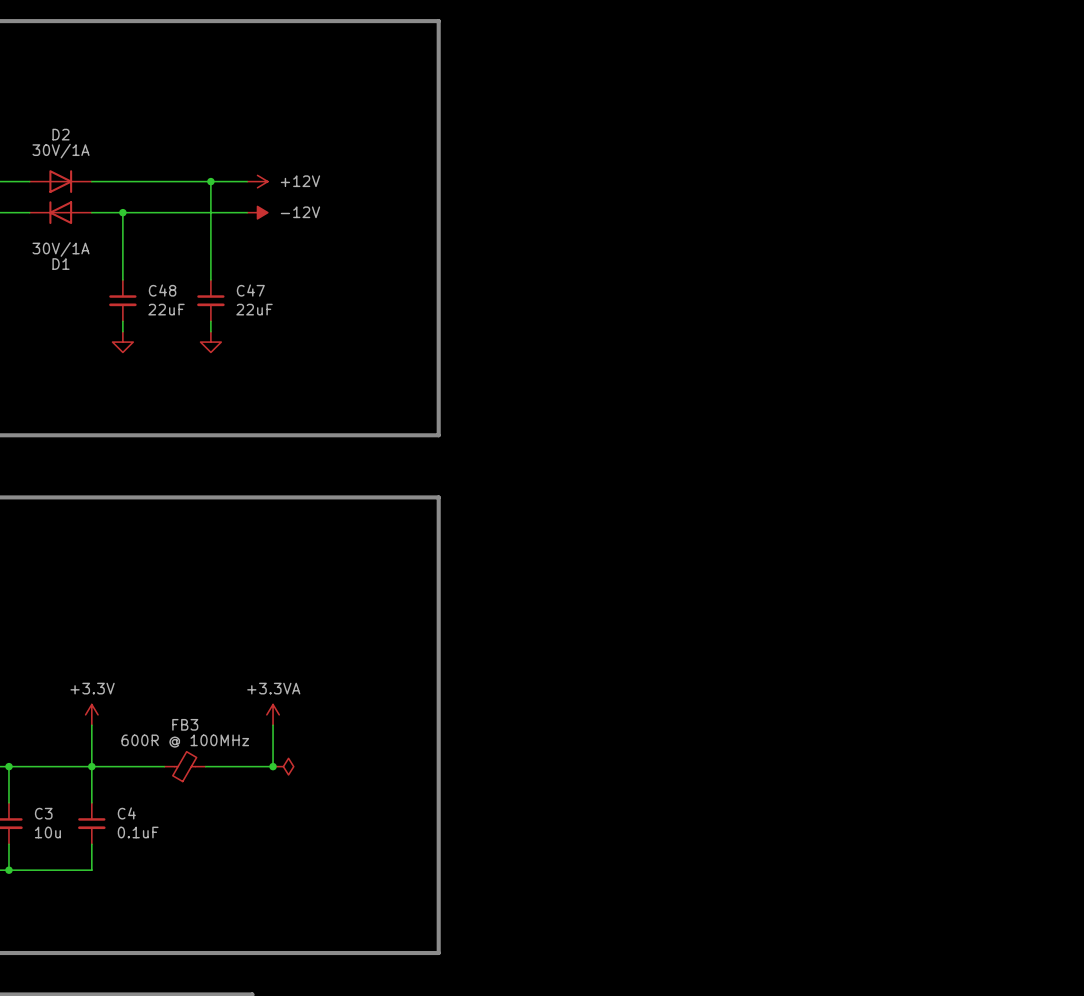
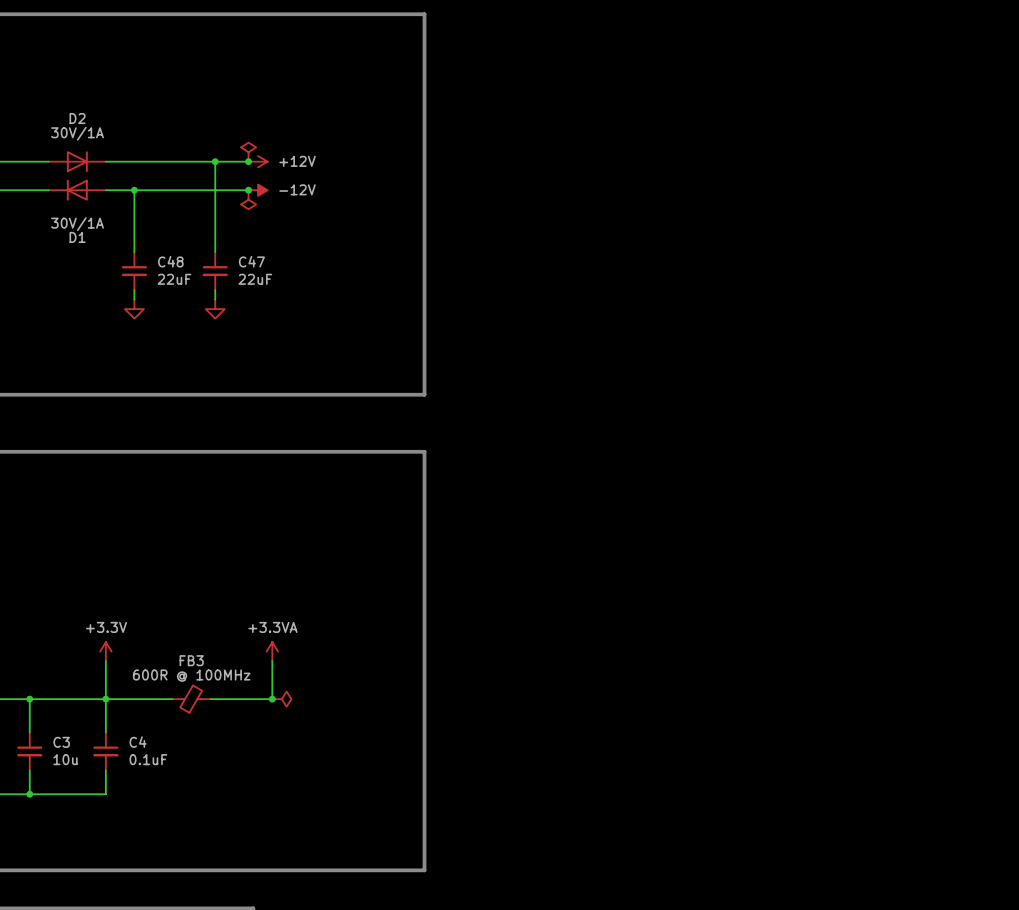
power symbol: none -> (248, 152)
junction: none -> (248, 161)
junction: none -> (248, 190)
power symbol: none -> (248, 199)

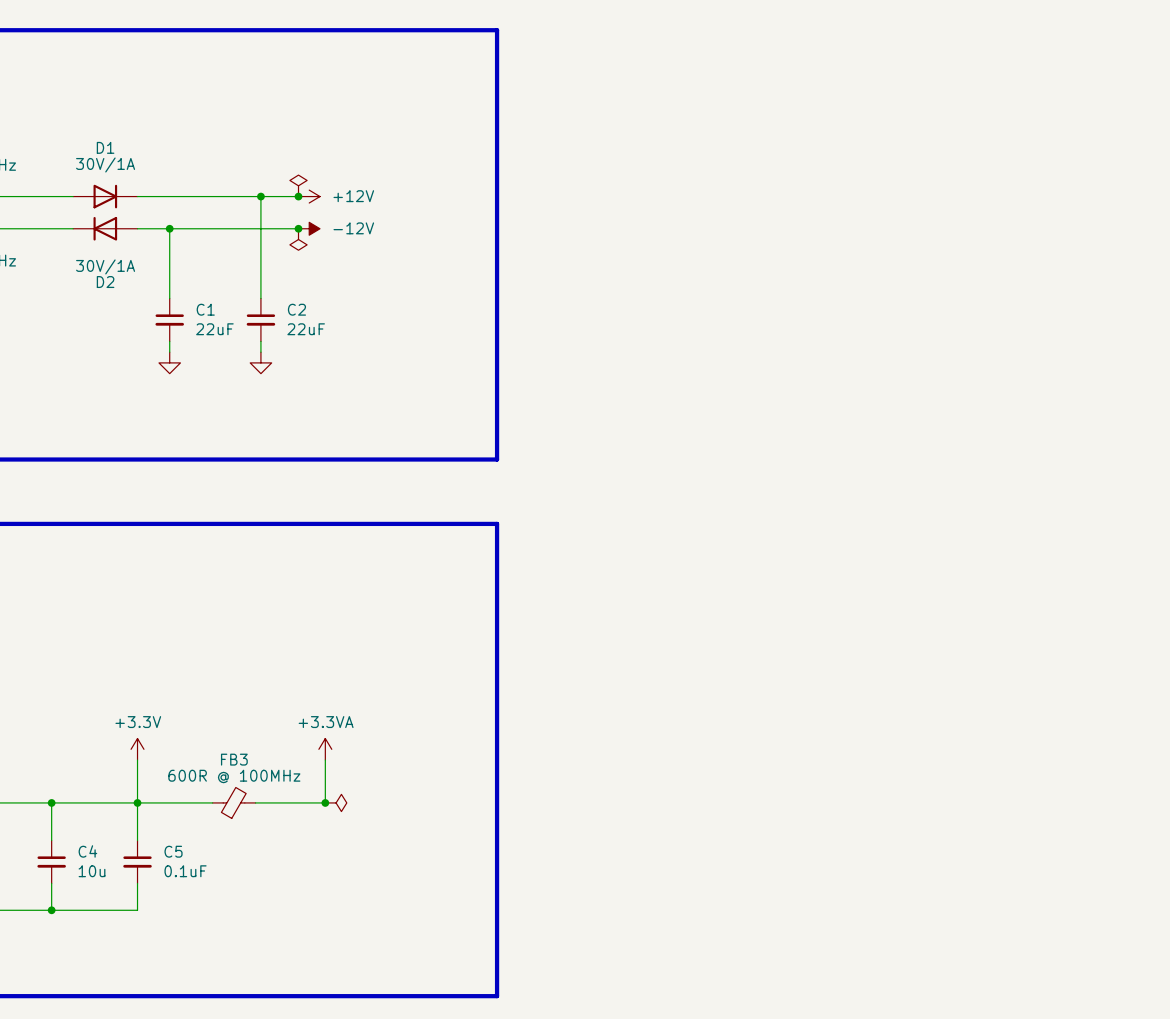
D2 name: D2 (77, 118) -> D1 (105, 147)
D1 name: D1 (77, 237) -> D2 (105, 282)
C48 name: C48 (170, 261) -> C1 (205, 309)
C47 name: C47 (251, 261) -> C2 (296, 309)
C3 name: C3 (61, 742) -> C4 (87, 851)
C4 name: C4 (138, 742) -> C5 (173, 851)

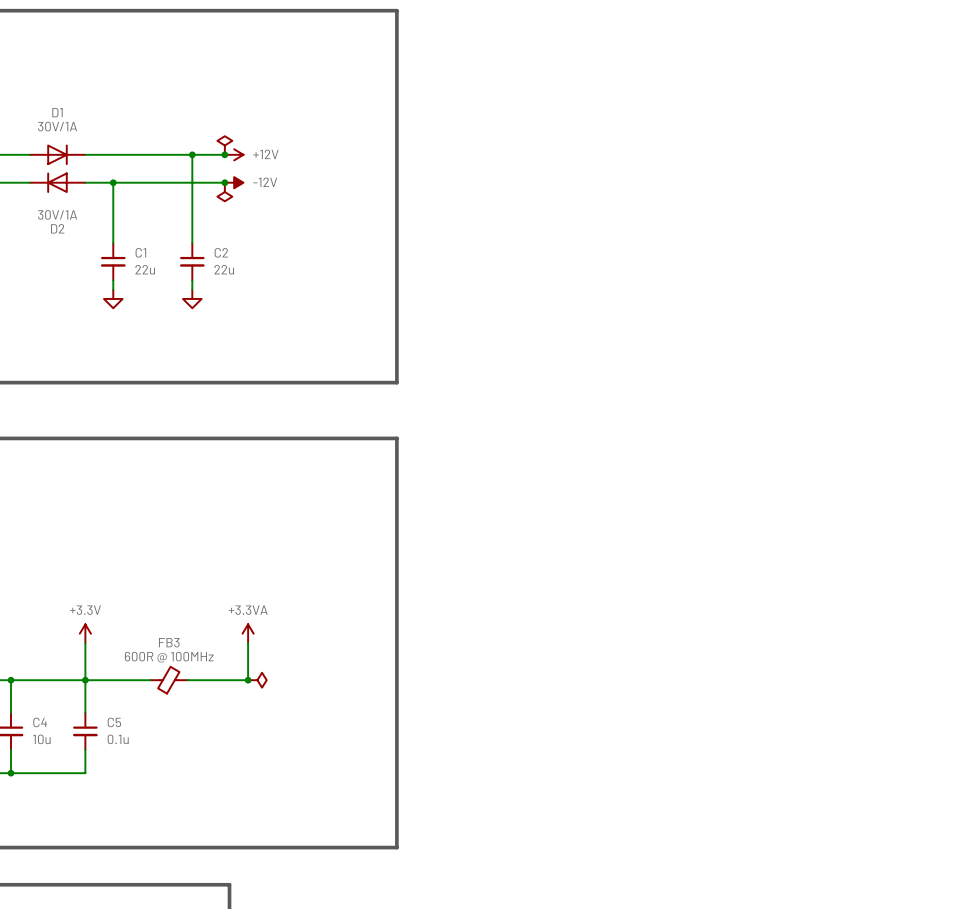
C1 value: 22uF (214, 329) -> 22u (145, 269)
C2 value: 22uF (306, 329) -> 22u (224, 269)
C5 value: 0.1uF (185, 871) -> 0.1u (118, 739)

